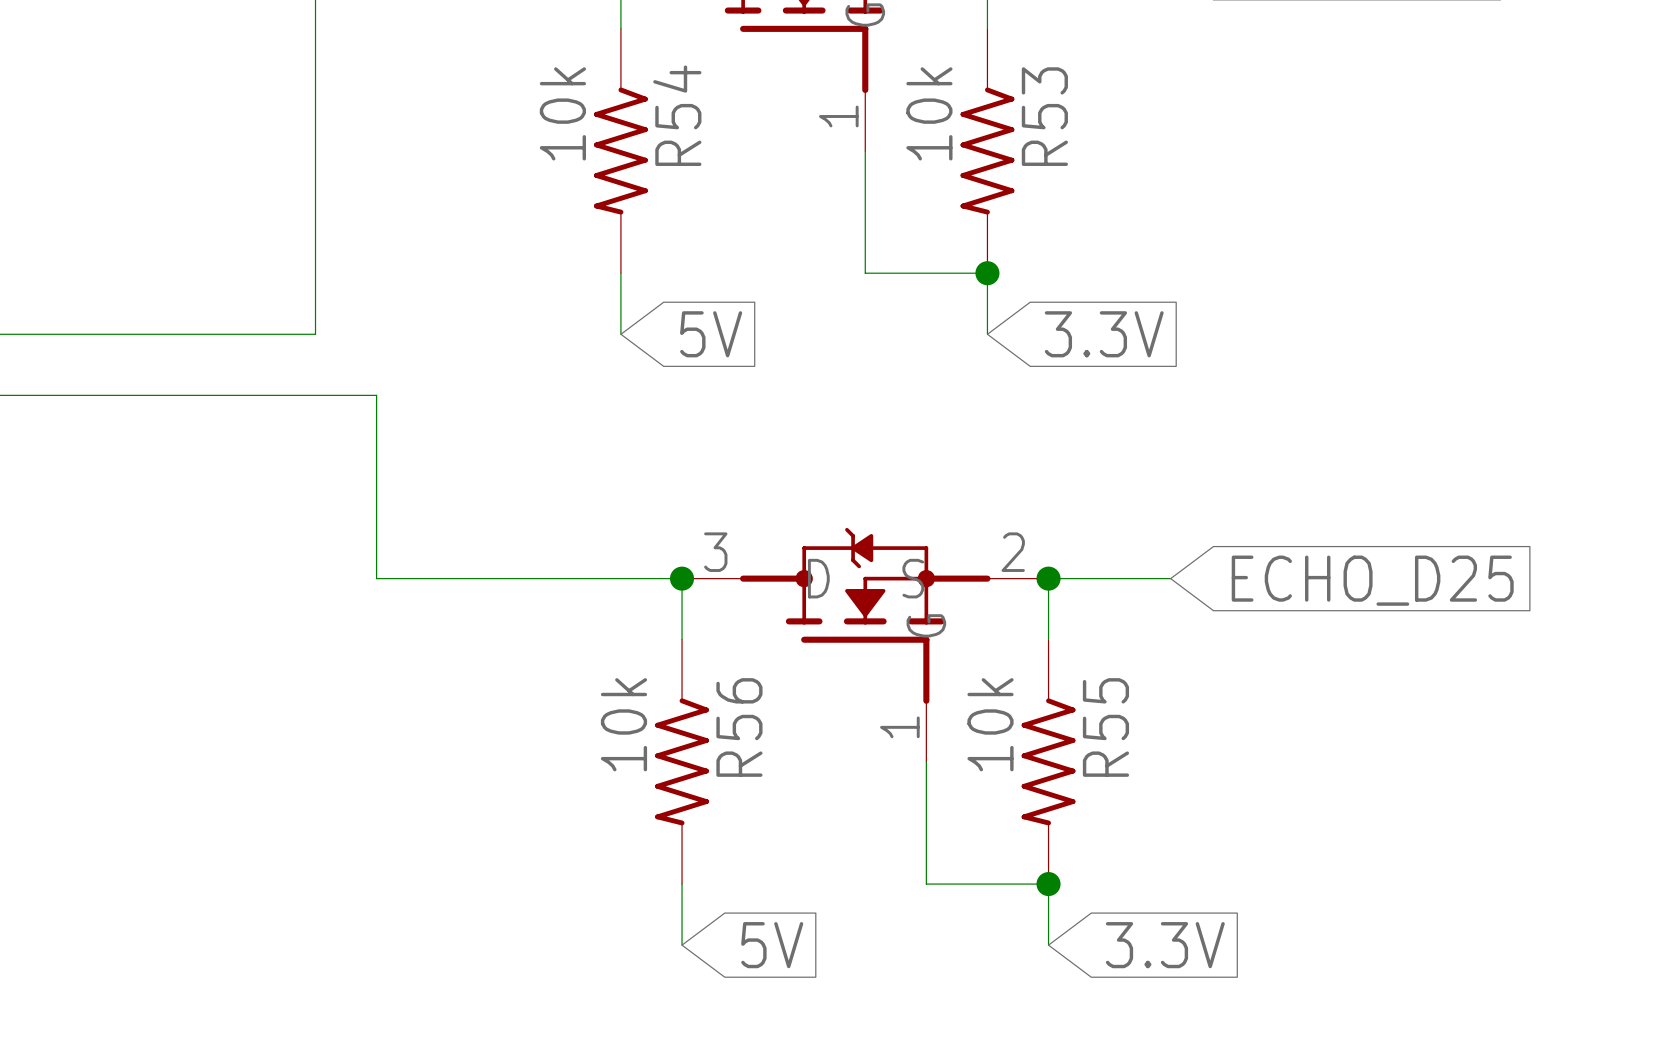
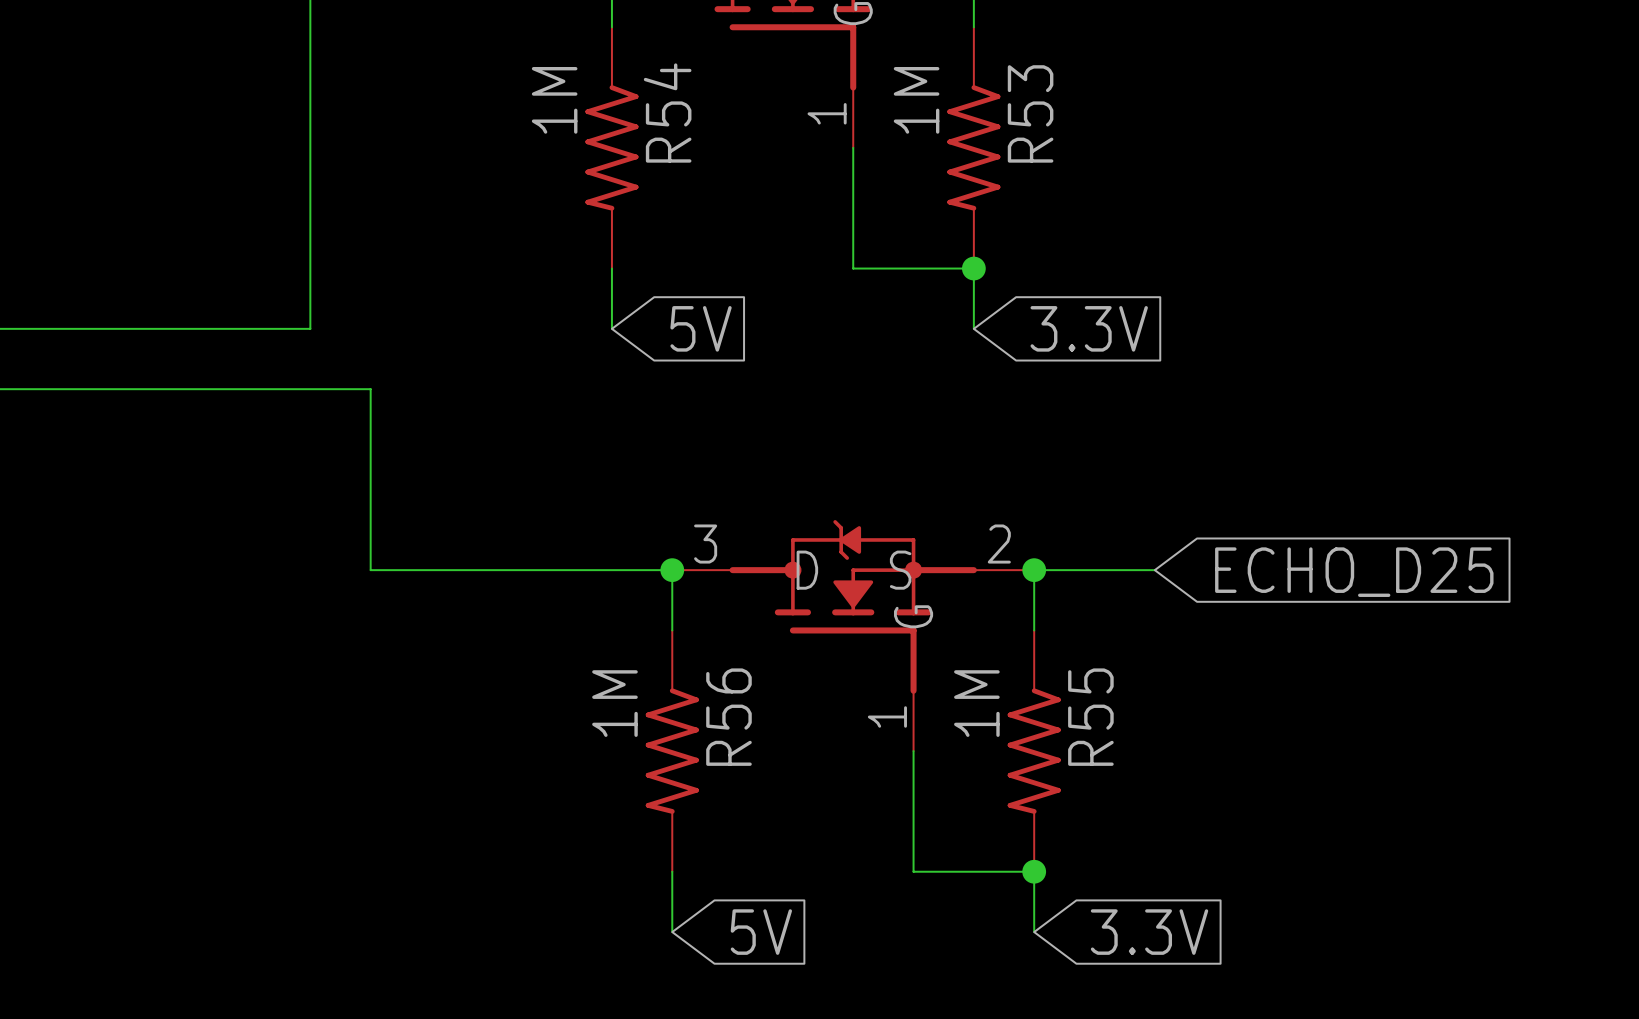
R54 value: 10k (562, 113) -> 1M (554, 100)
R53 value: 10k (929, 113) -> 1M (916, 100)
R56 value: 10k (623, 724) -> 1M (614, 703)
R55 value: 10k (990, 724) -> 1M (976, 703)

